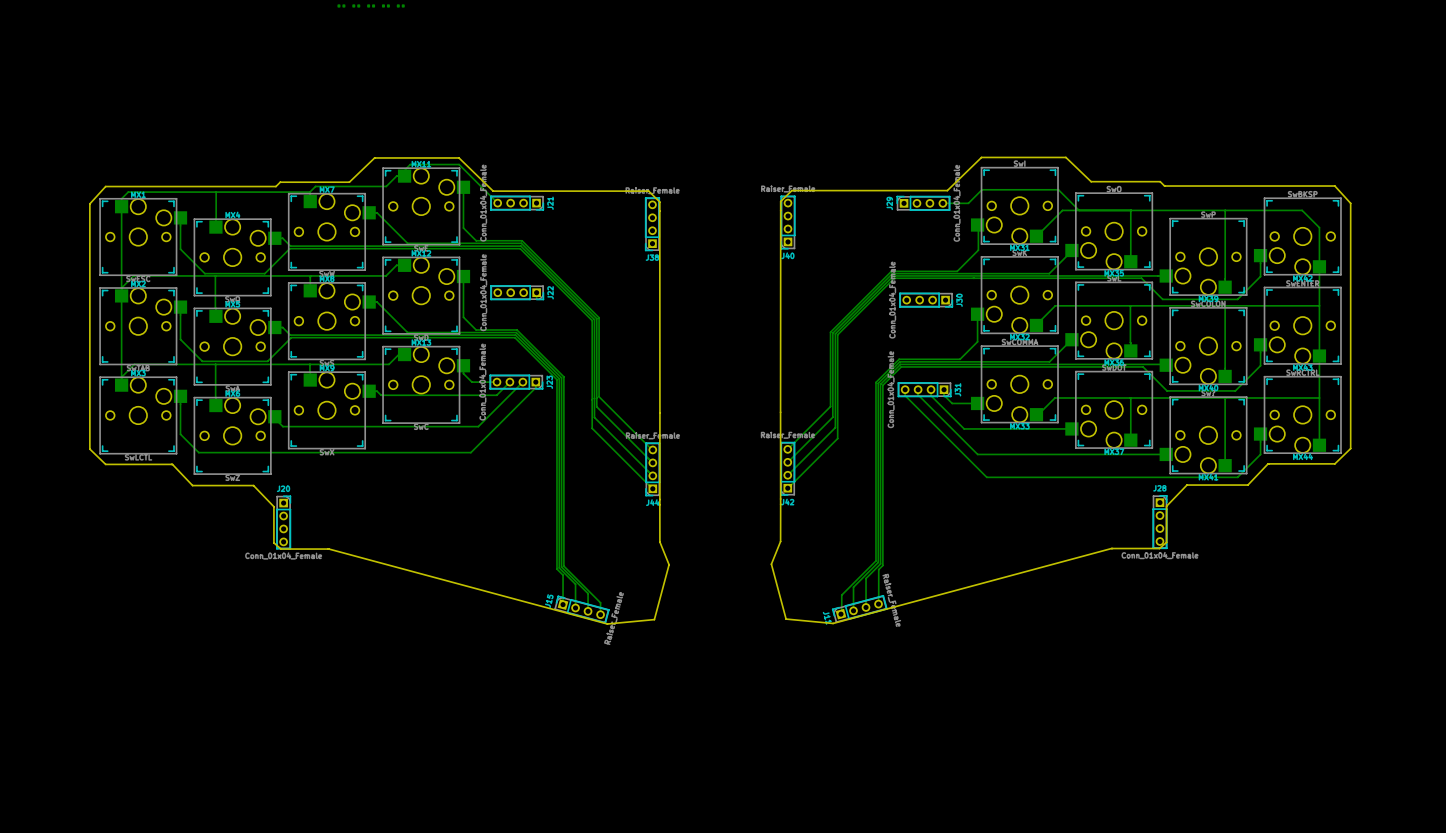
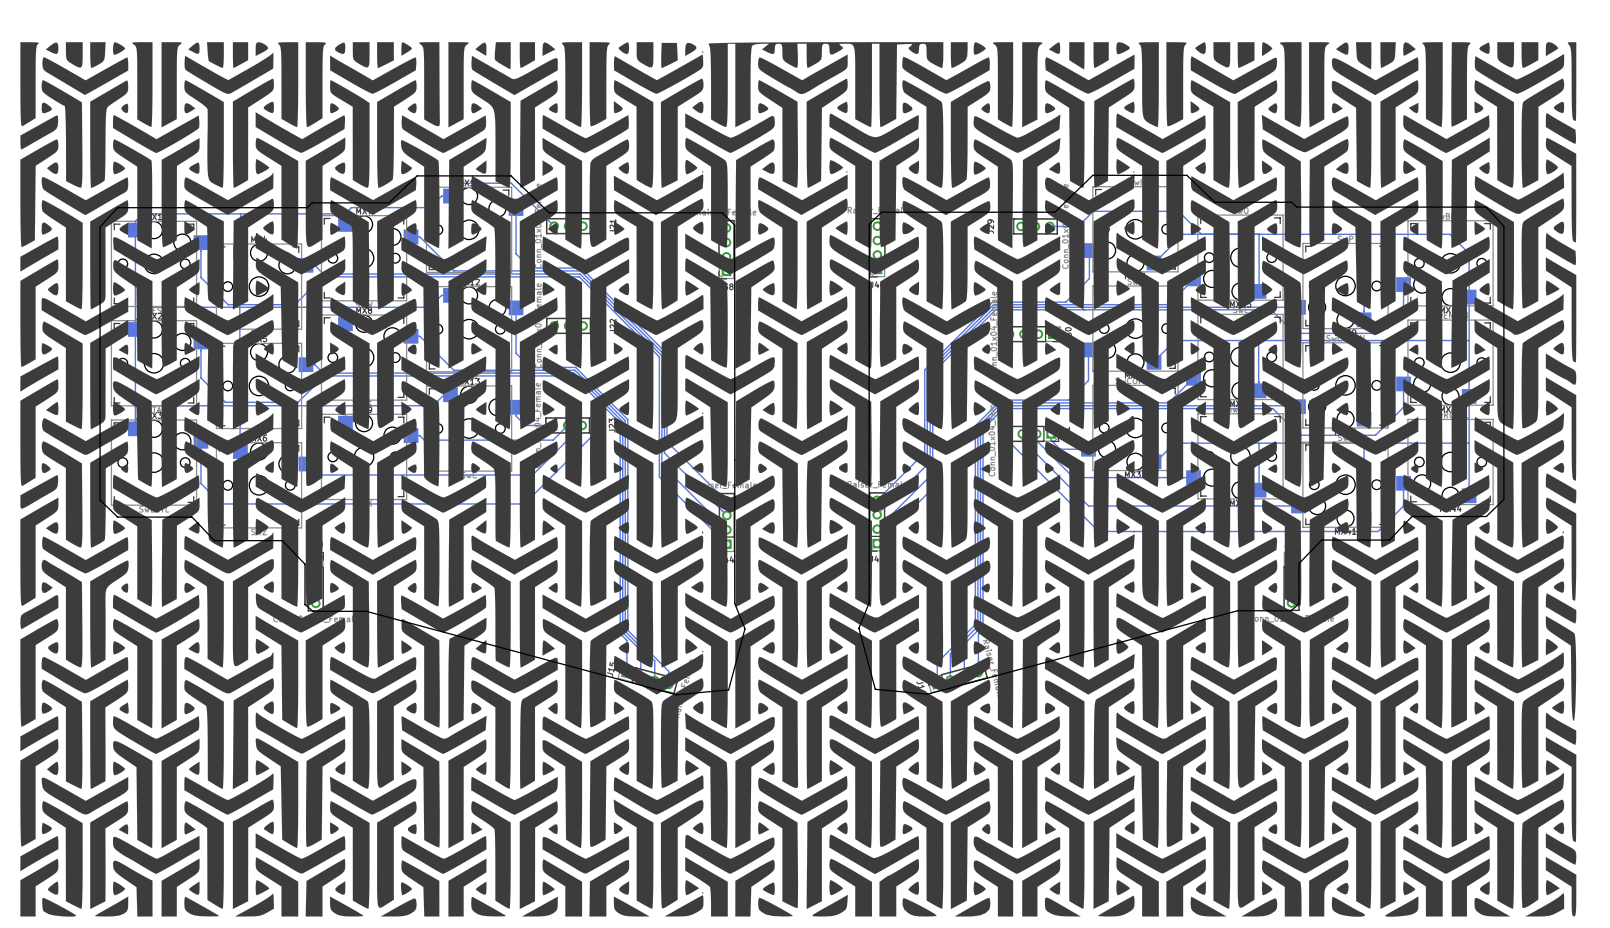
part: (341, 5) -> none
part: (356, 5) -> none
part: (371, 5) -> none
part: (385, 5) -> none
part: (400, 5) -> none
drawing: none -> [20, 42, 1577, 917]

